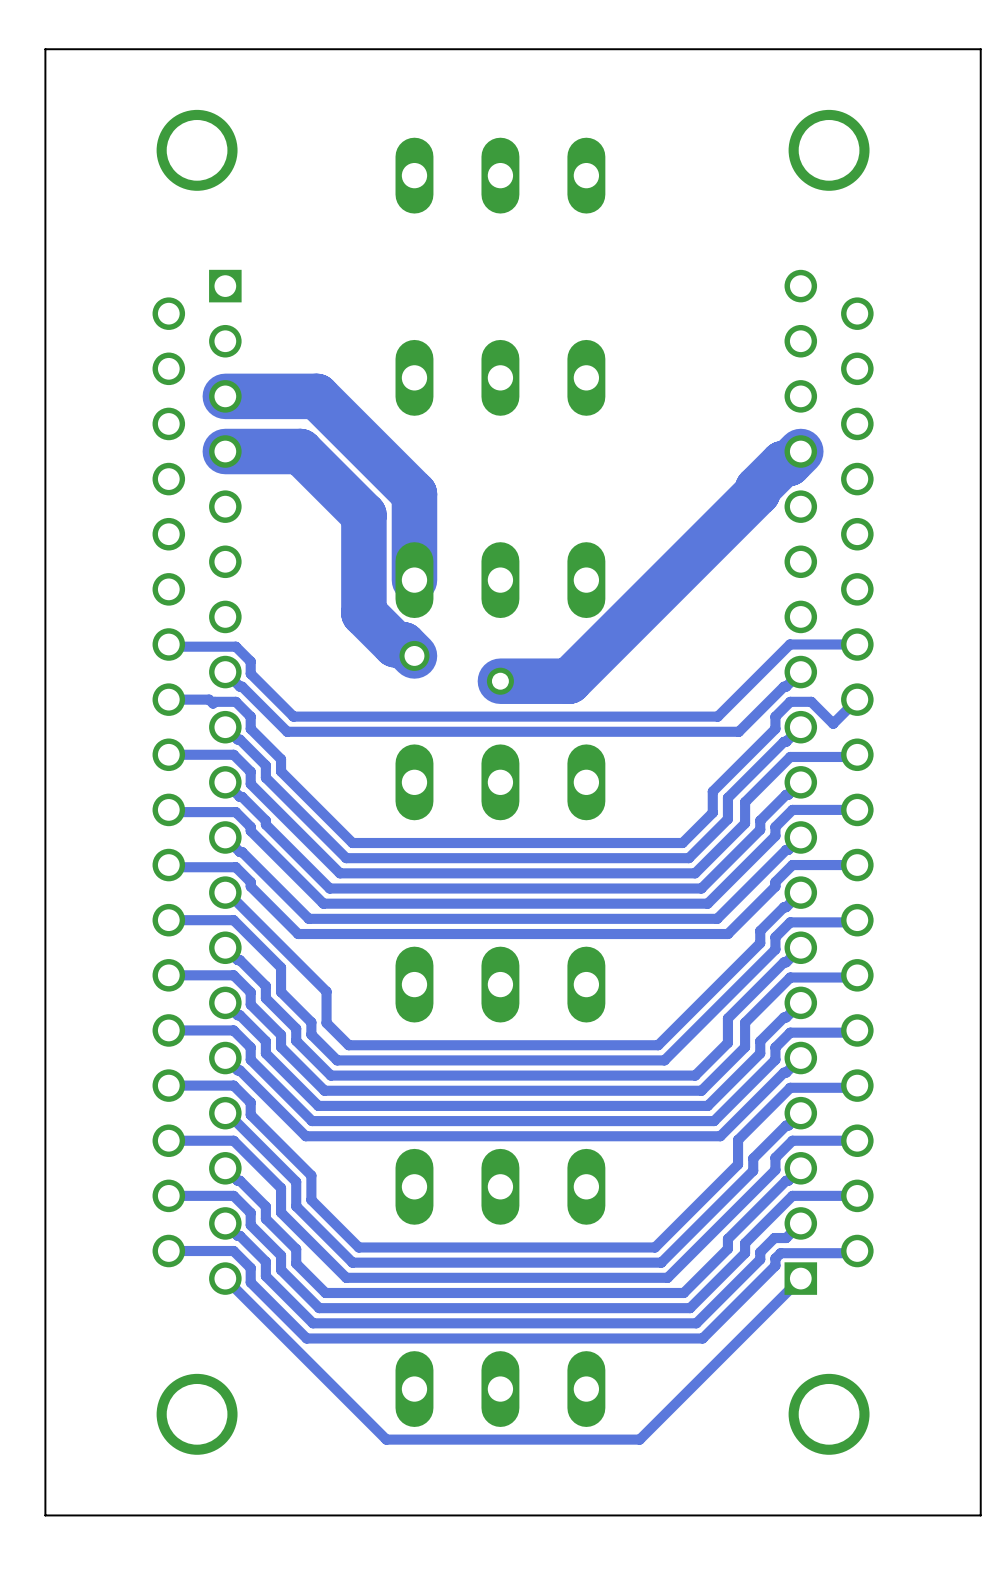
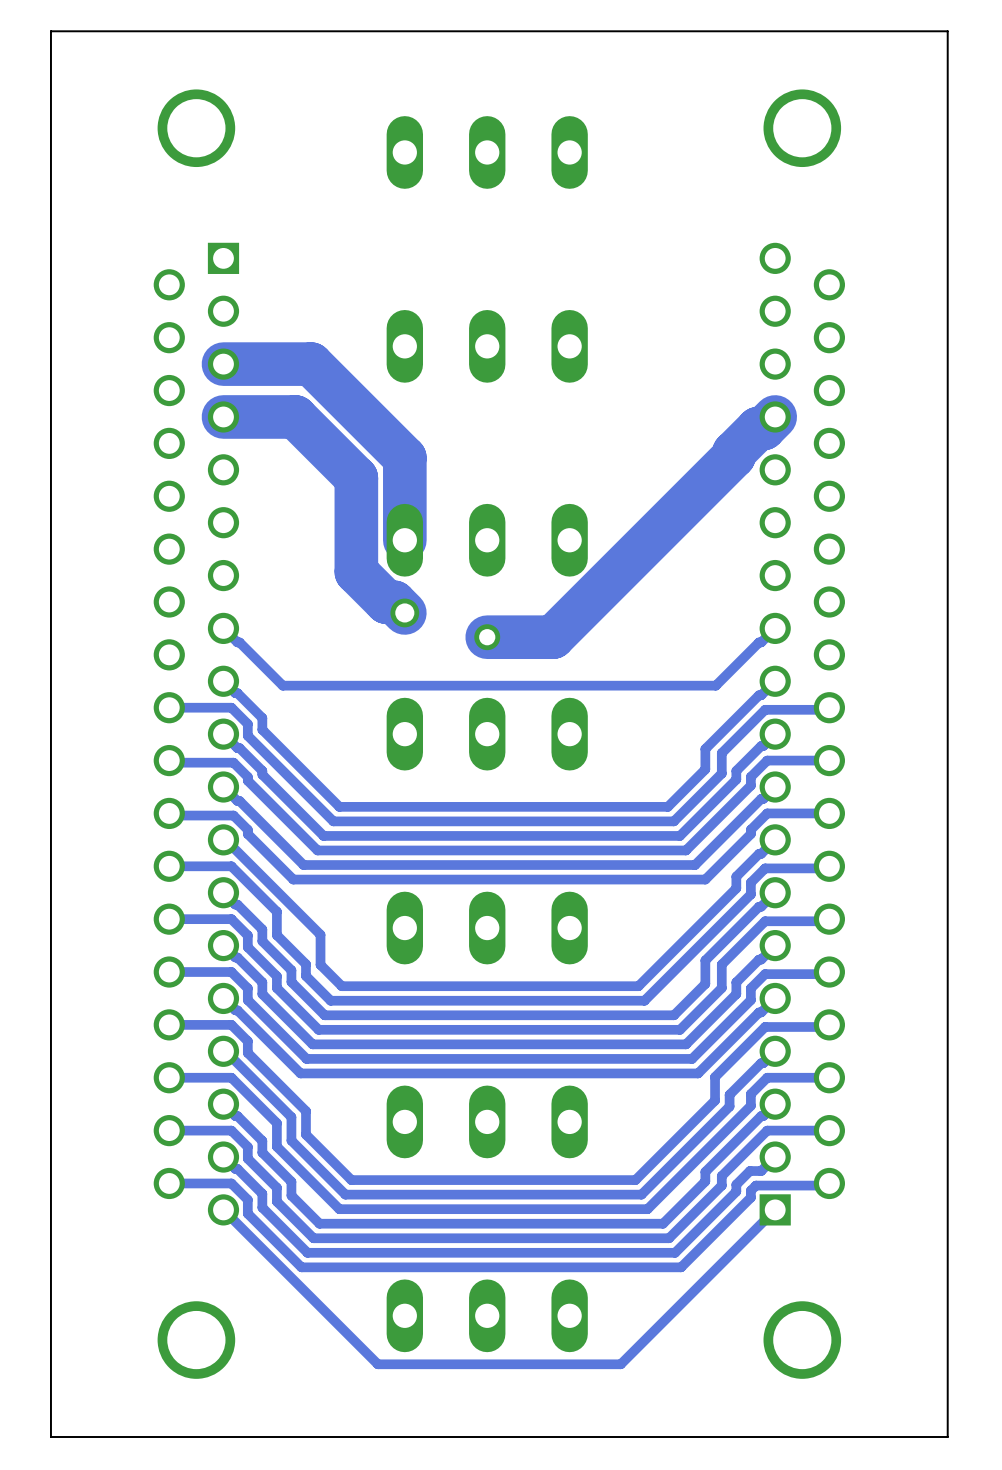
track: (857, 644) (789, 644) (717, 716) (293, 716) (250, 673) (250, 661) (235, 646) (171, 646) (168, 644) -> none
track: (857, 699) (833, 723) (811, 701) (790, 701) (775, 716) (775, 728) (712, 791) (712, 812) (682, 843) (352, 843) (281, 771) (281, 759) (250, 728) (250, 716) (235, 701) (214, 701) (213, 703) (209, 699) (168, 699) -> none

